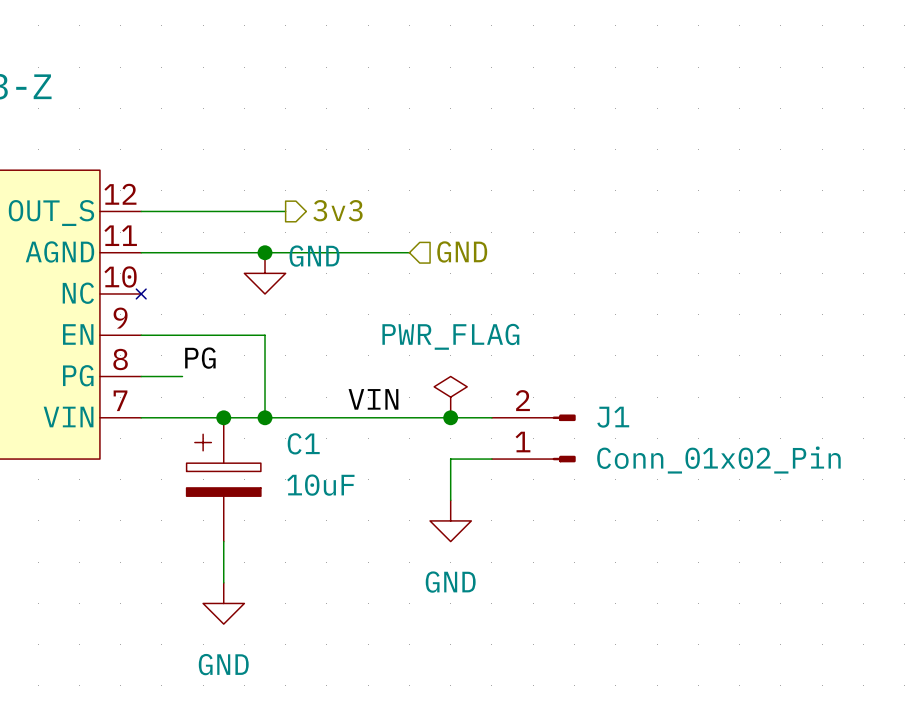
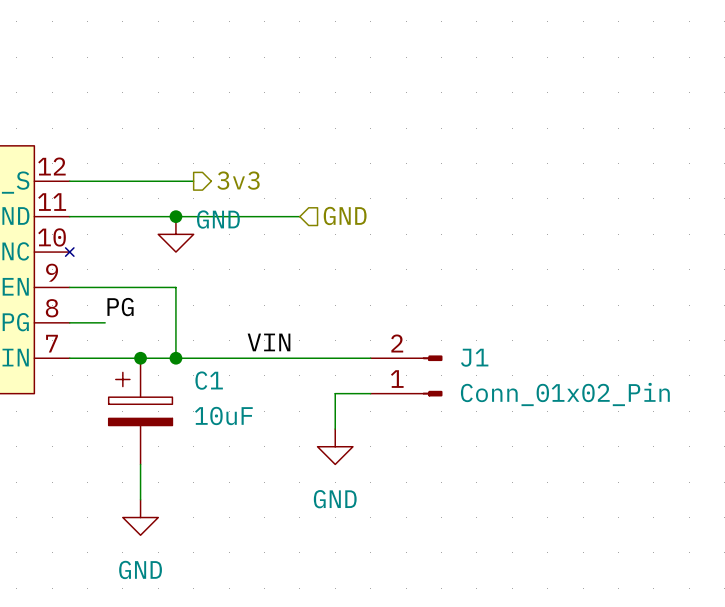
power symbol: PWR_FLAG (450, 397) -> none
junction: (450, 417) -> none

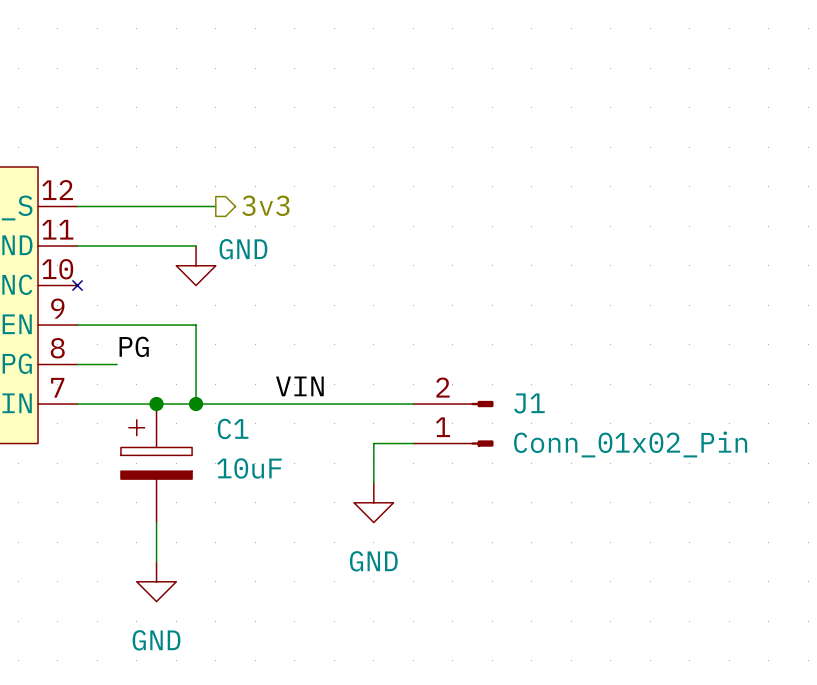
hierarchical label: GND (345, 215) -> none
wire: (175, 216) (299, 216) -> none
junction: (175, 216) -> none

